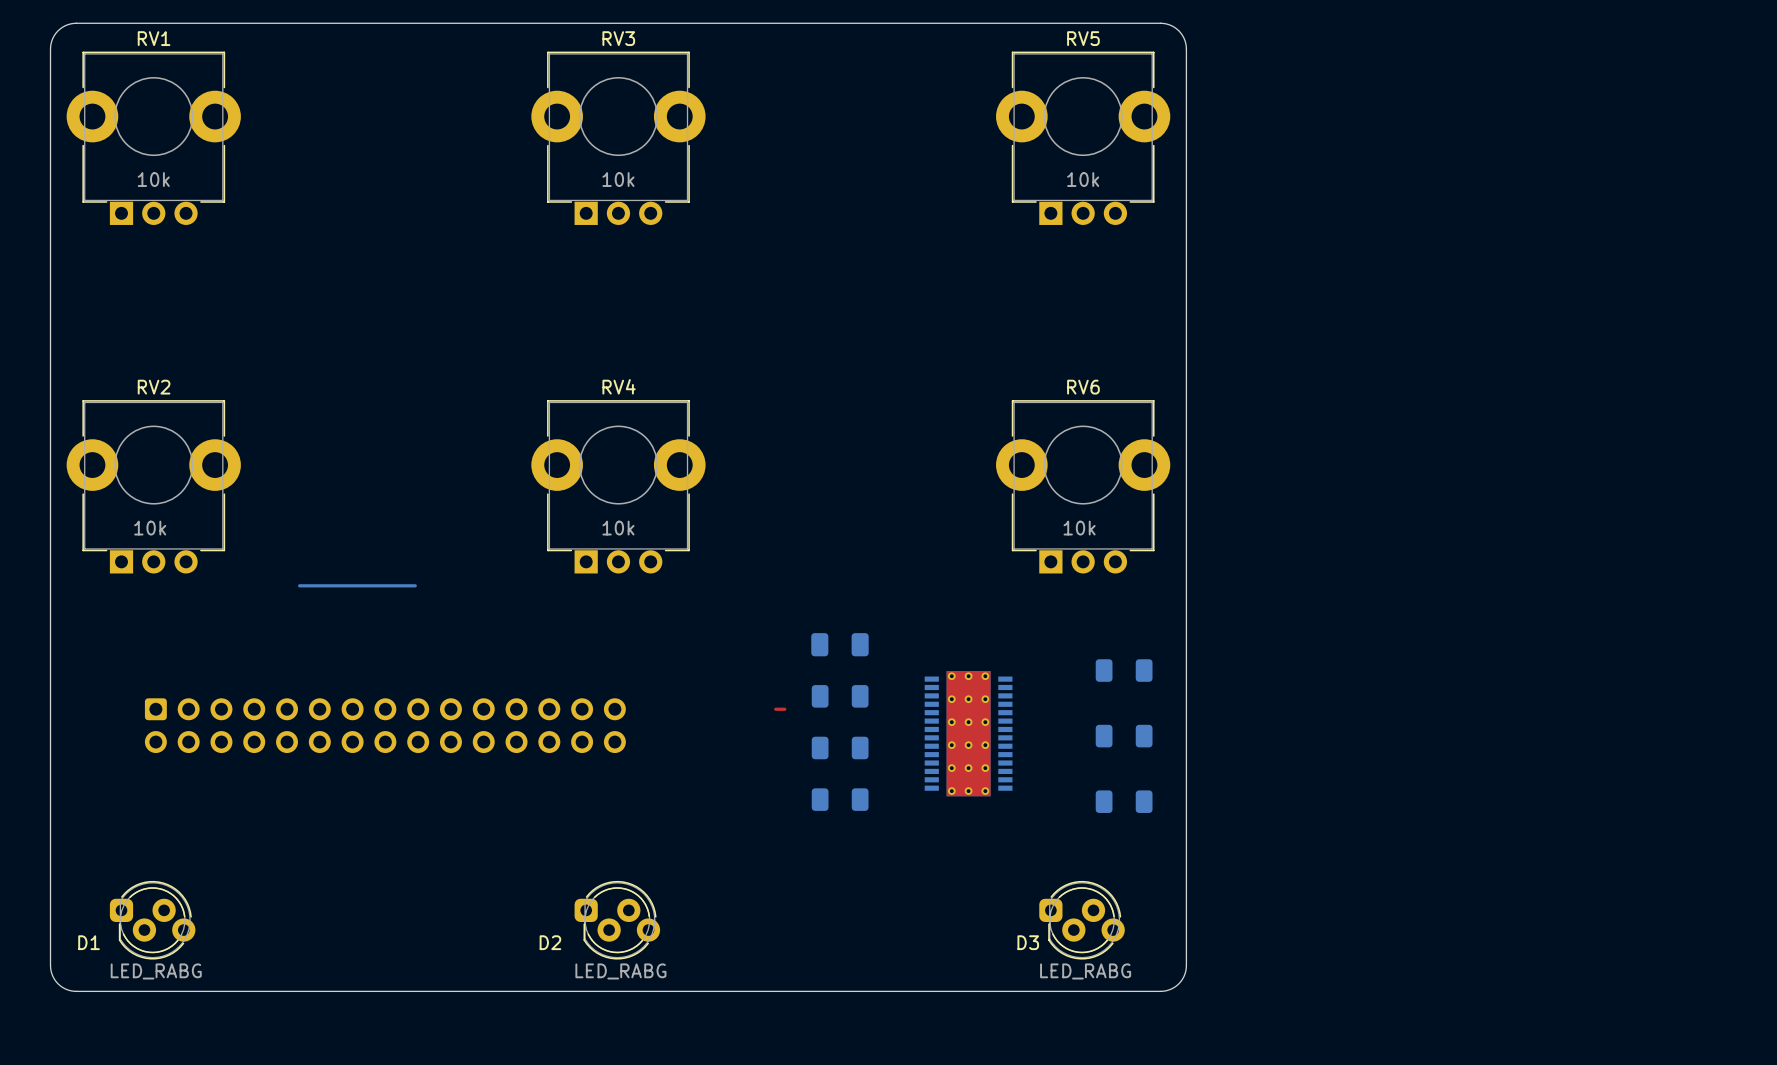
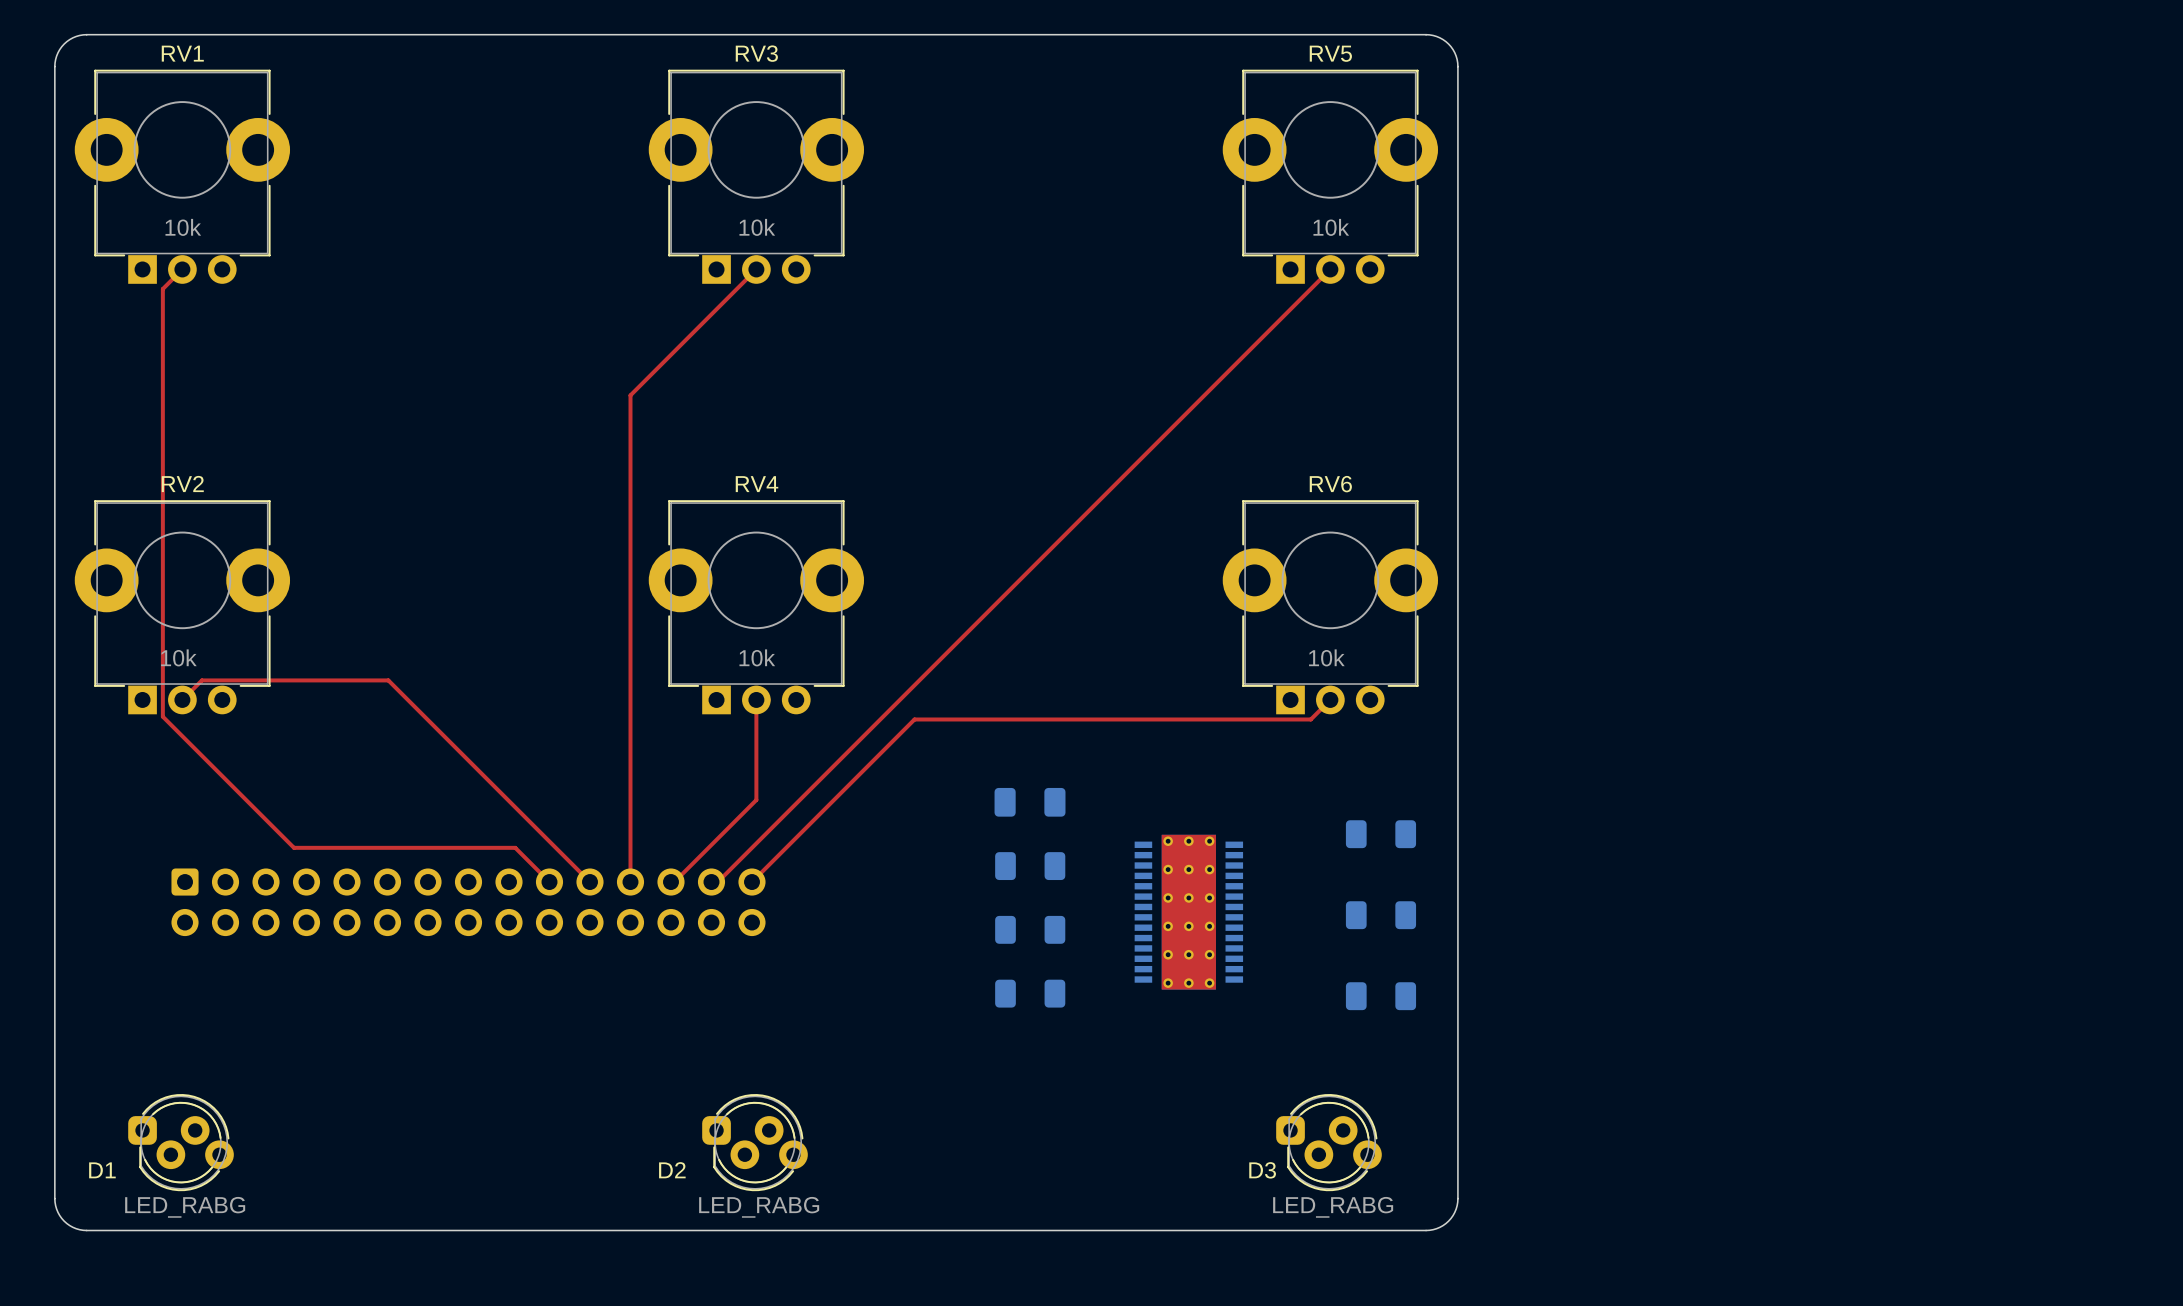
top track: none -> (182, 269) (162, 289) (162, 716) (294, 847) (515, 847) (549, 882)
top track: none -> (756, 269) (630, 395) (630, 882)
top track: none -> (1330, 269) (717, 882) (711, 882)
top track: none -> (182, 699) (201, 680) (388, 680) (590, 882)
top track: none -> (756, 699) (756, 800) (676, 879)
top track: none -> (1330, 699) (1310, 719) (914, 719) (751, 882)
bottom track: (299, 585) (415, 585) -> none
top track: (775, 709) (784, 709) -> none

